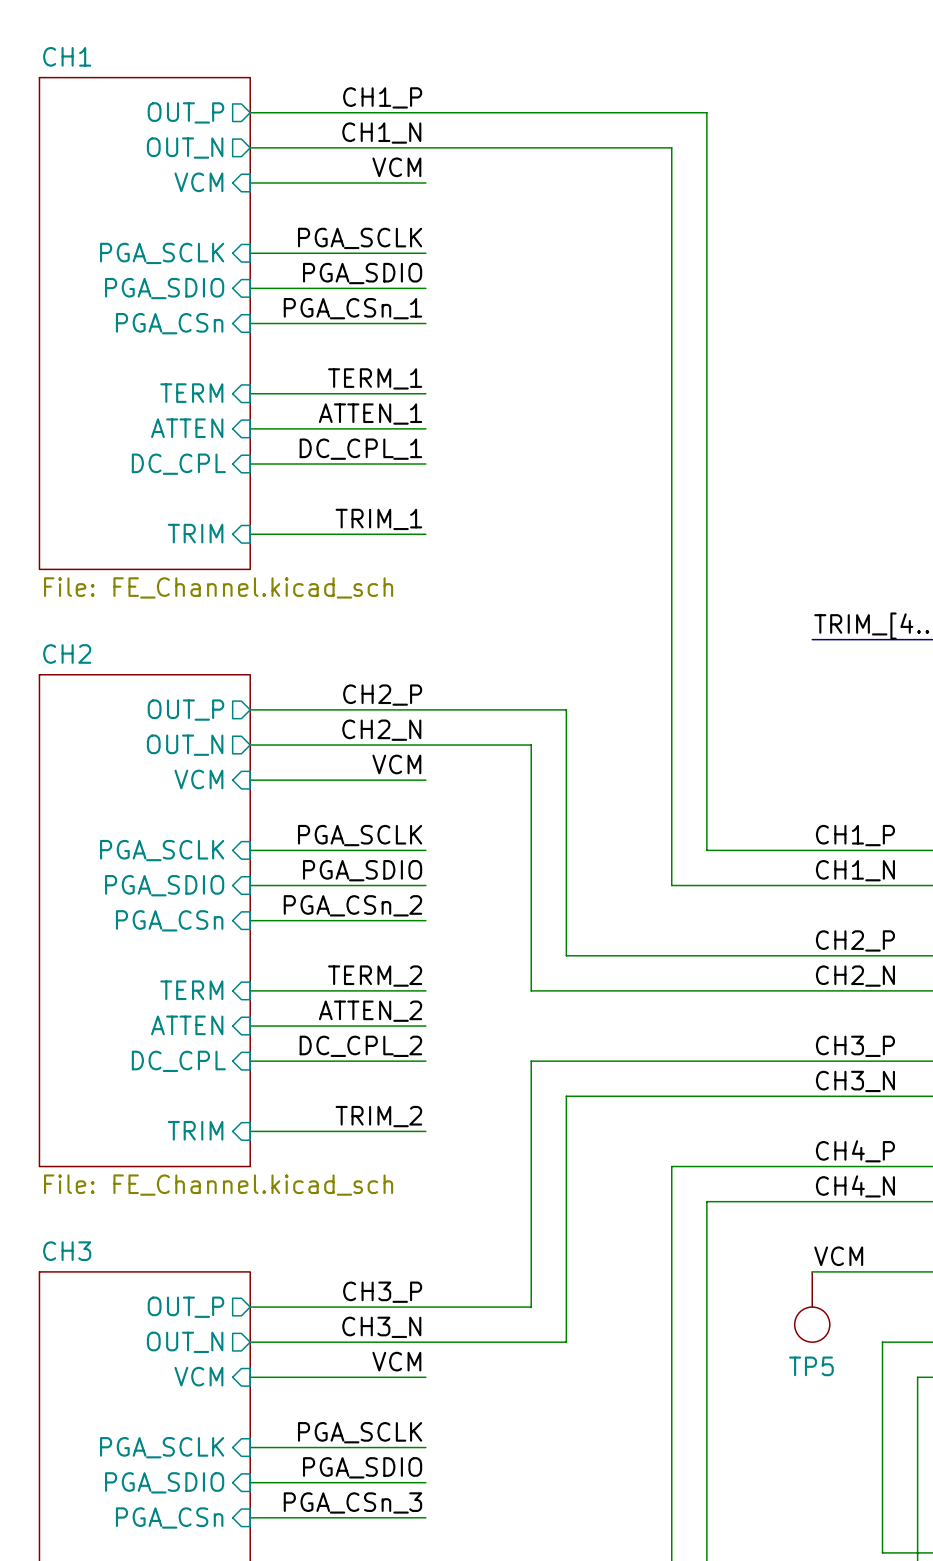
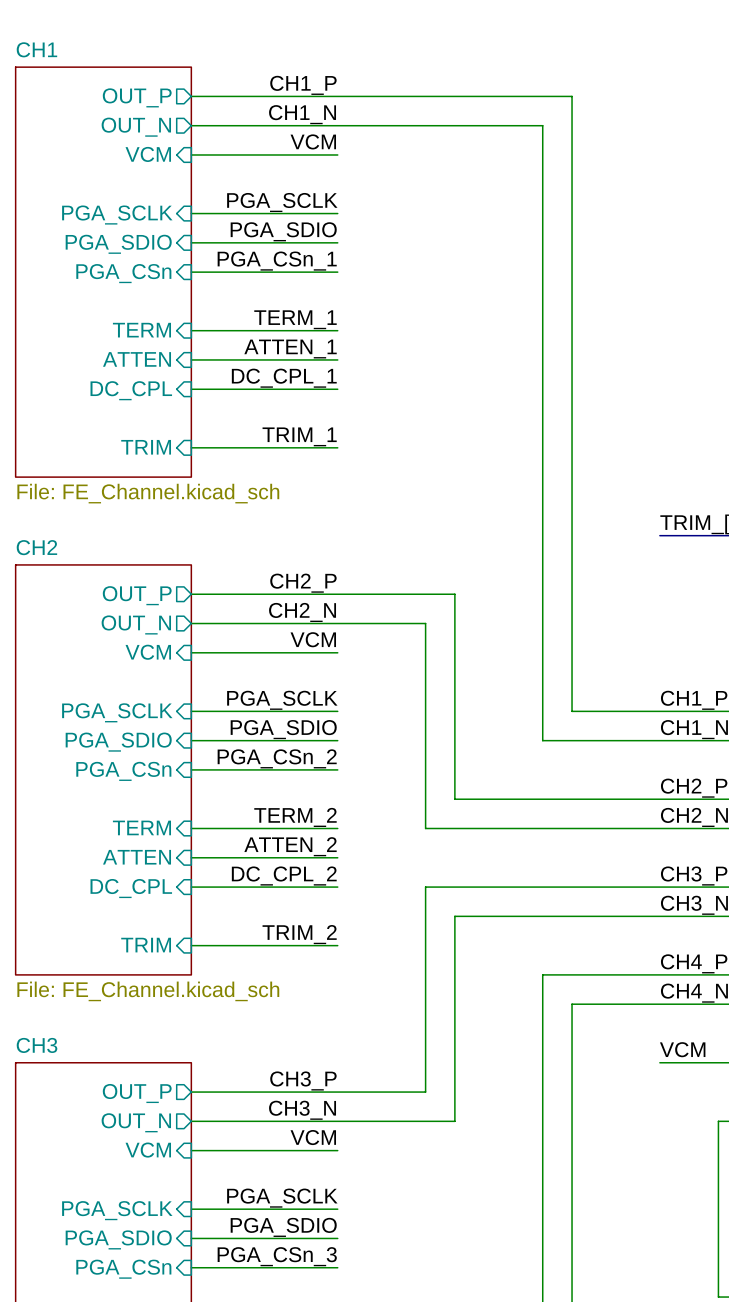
TP5: (812, 1307) -> none

